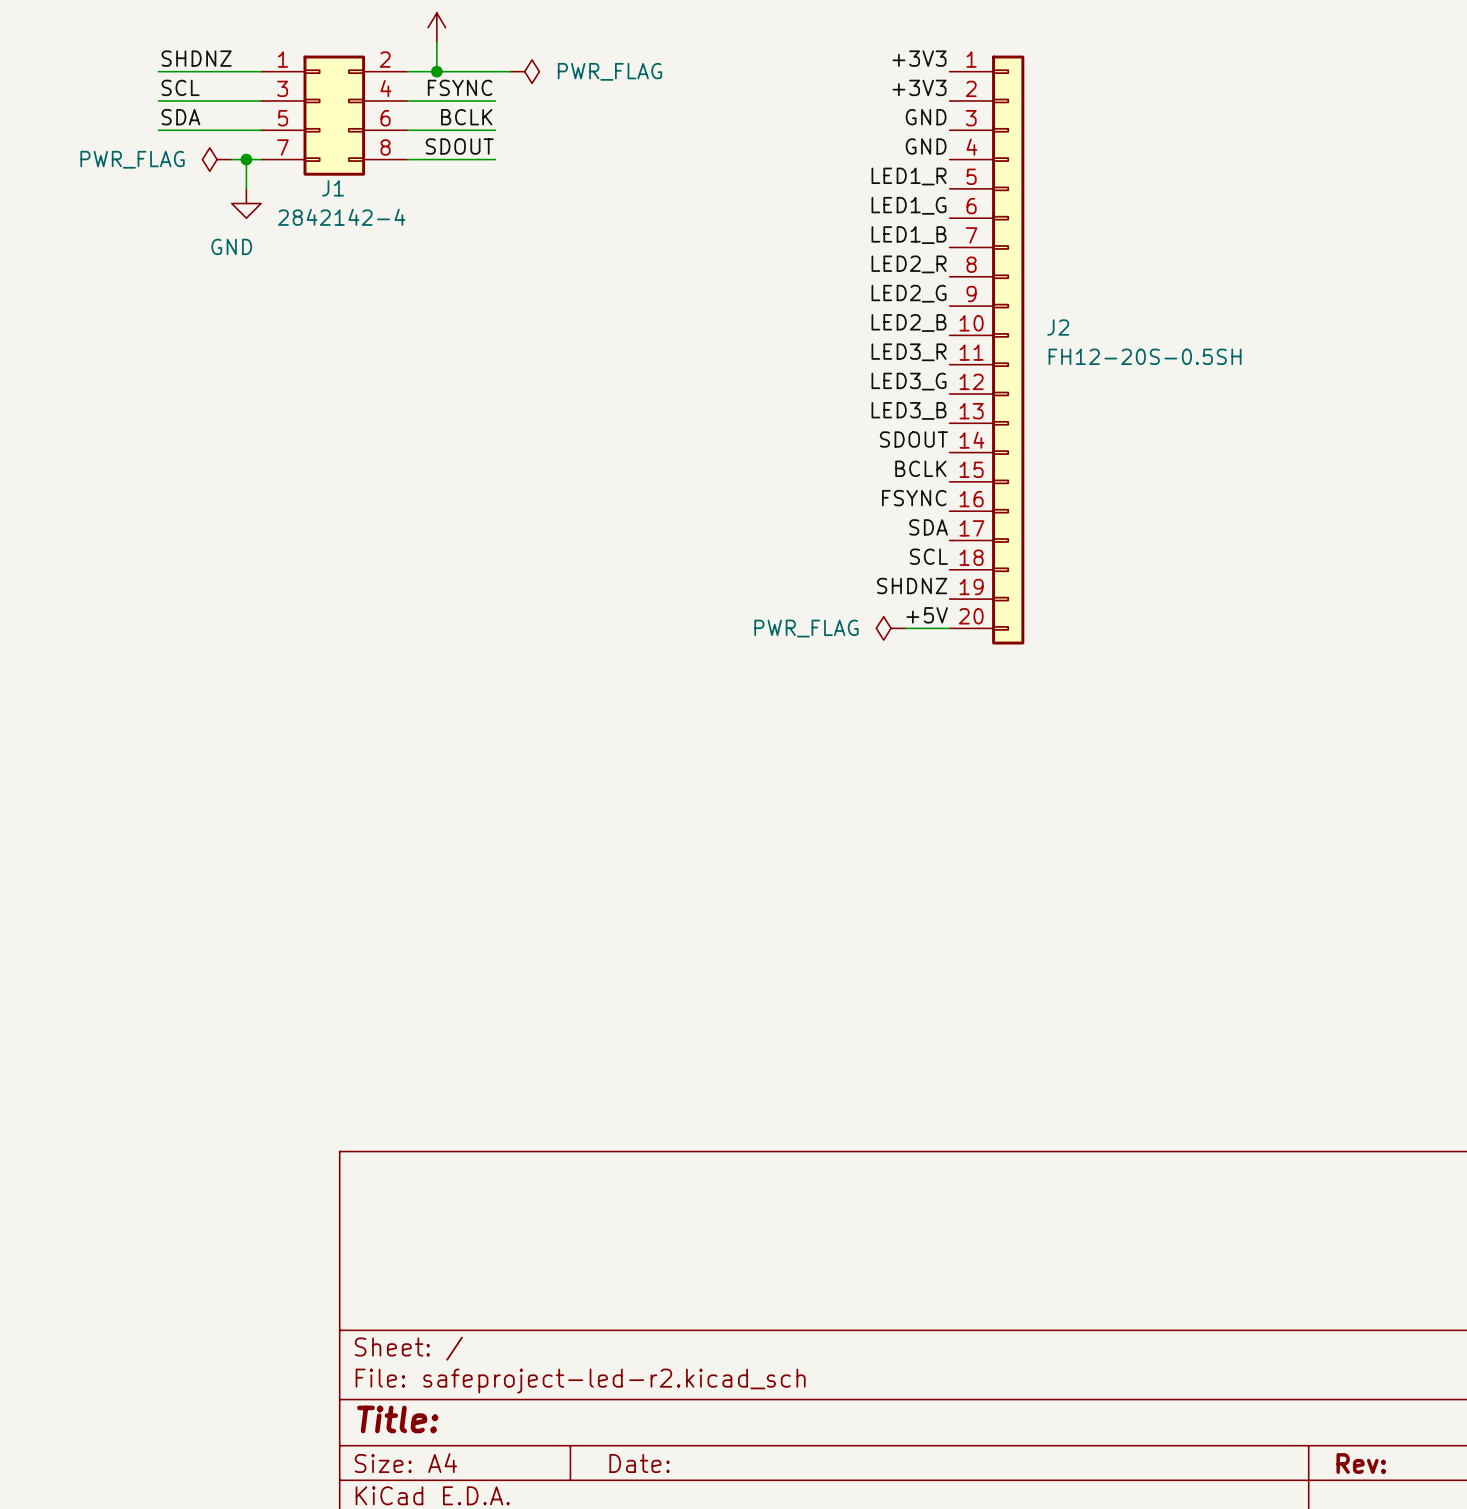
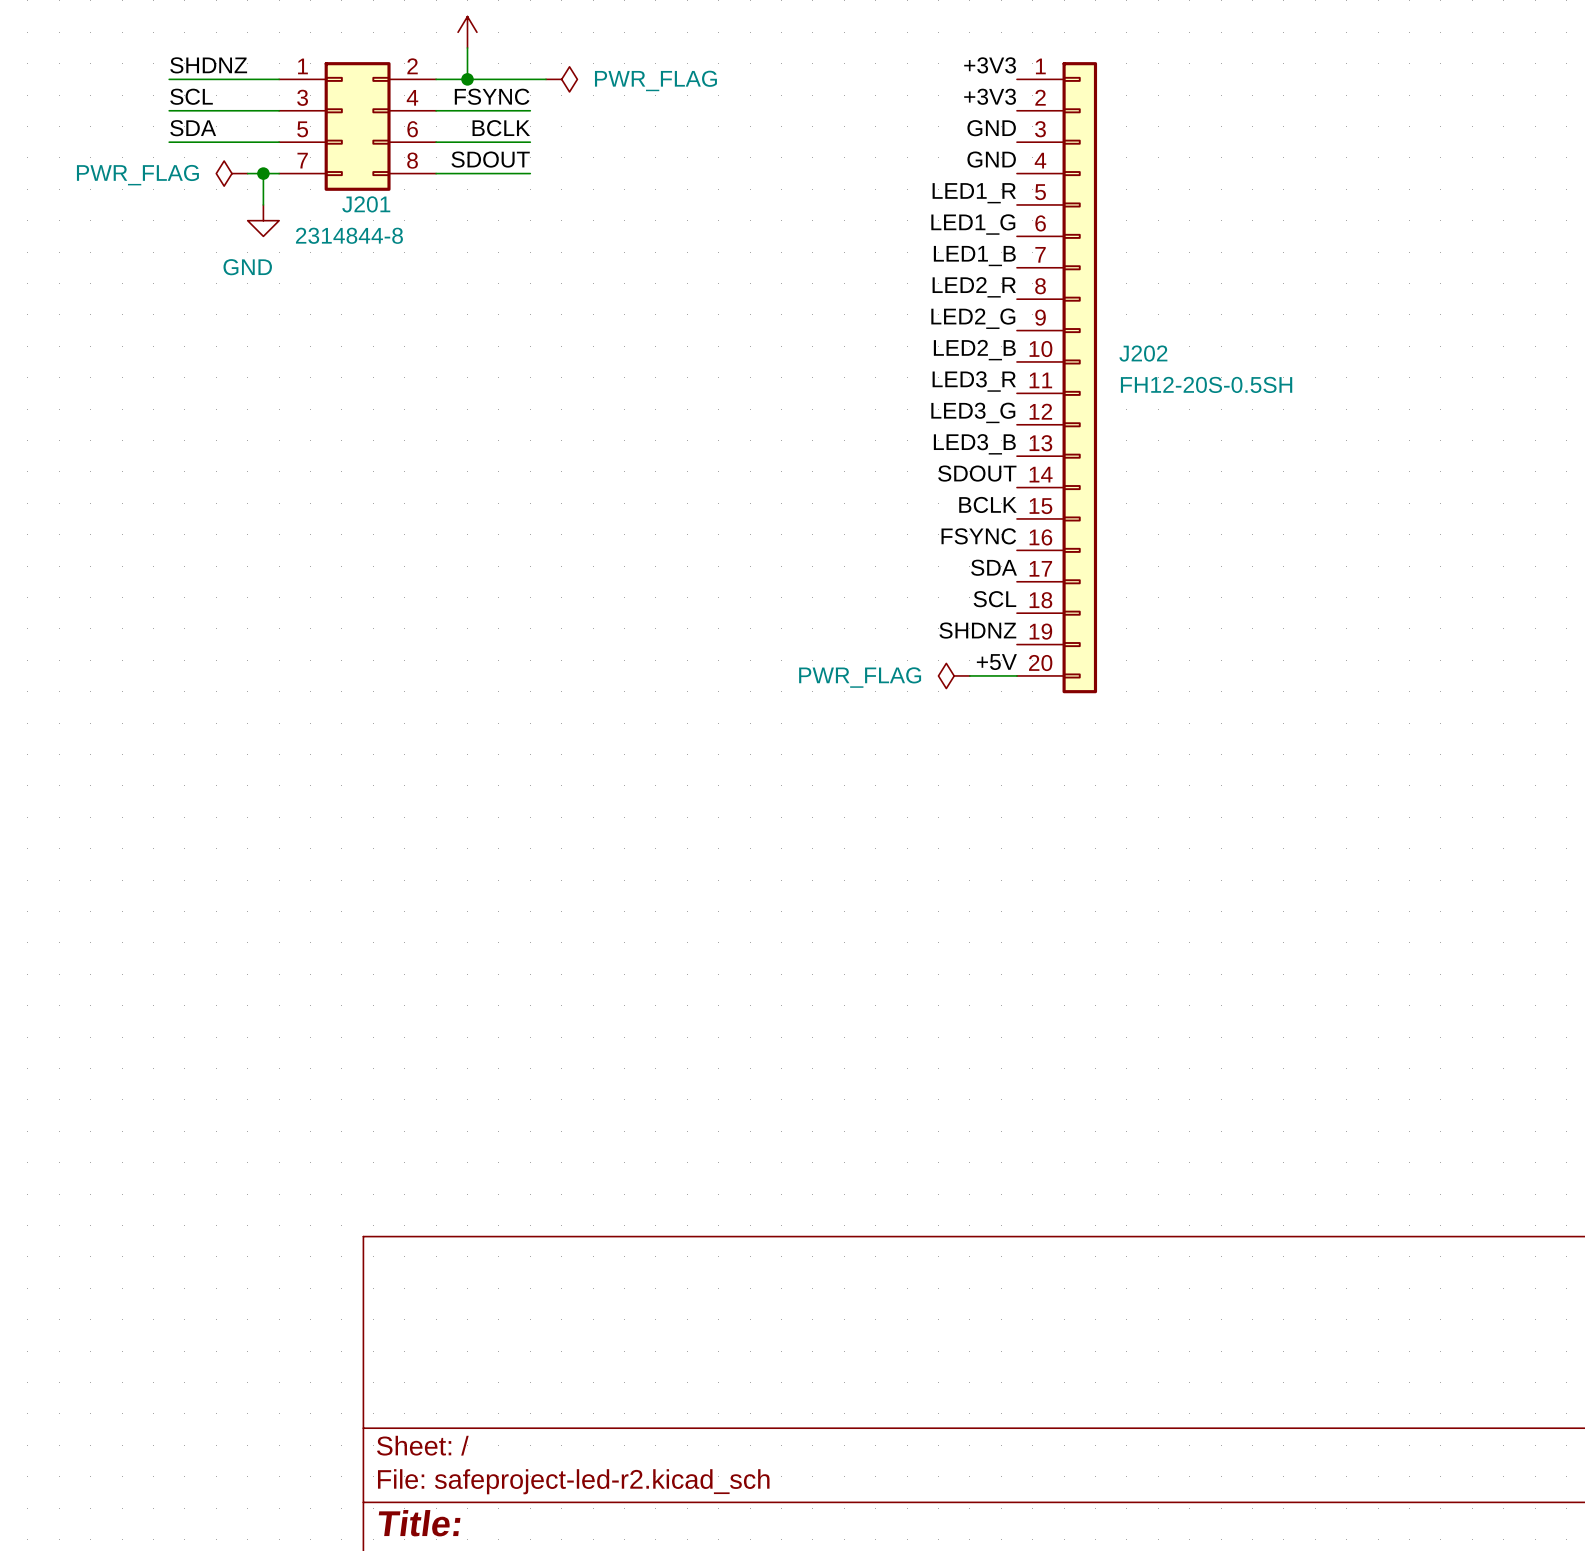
J1 name: J1 (333, 188) -> J201 (366, 204)
J1 value: 2842142-4 (341, 217) -> 2314844-8 (349, 235)
J2 name: J2 (1058, 327) -> J202 (1143, 353)

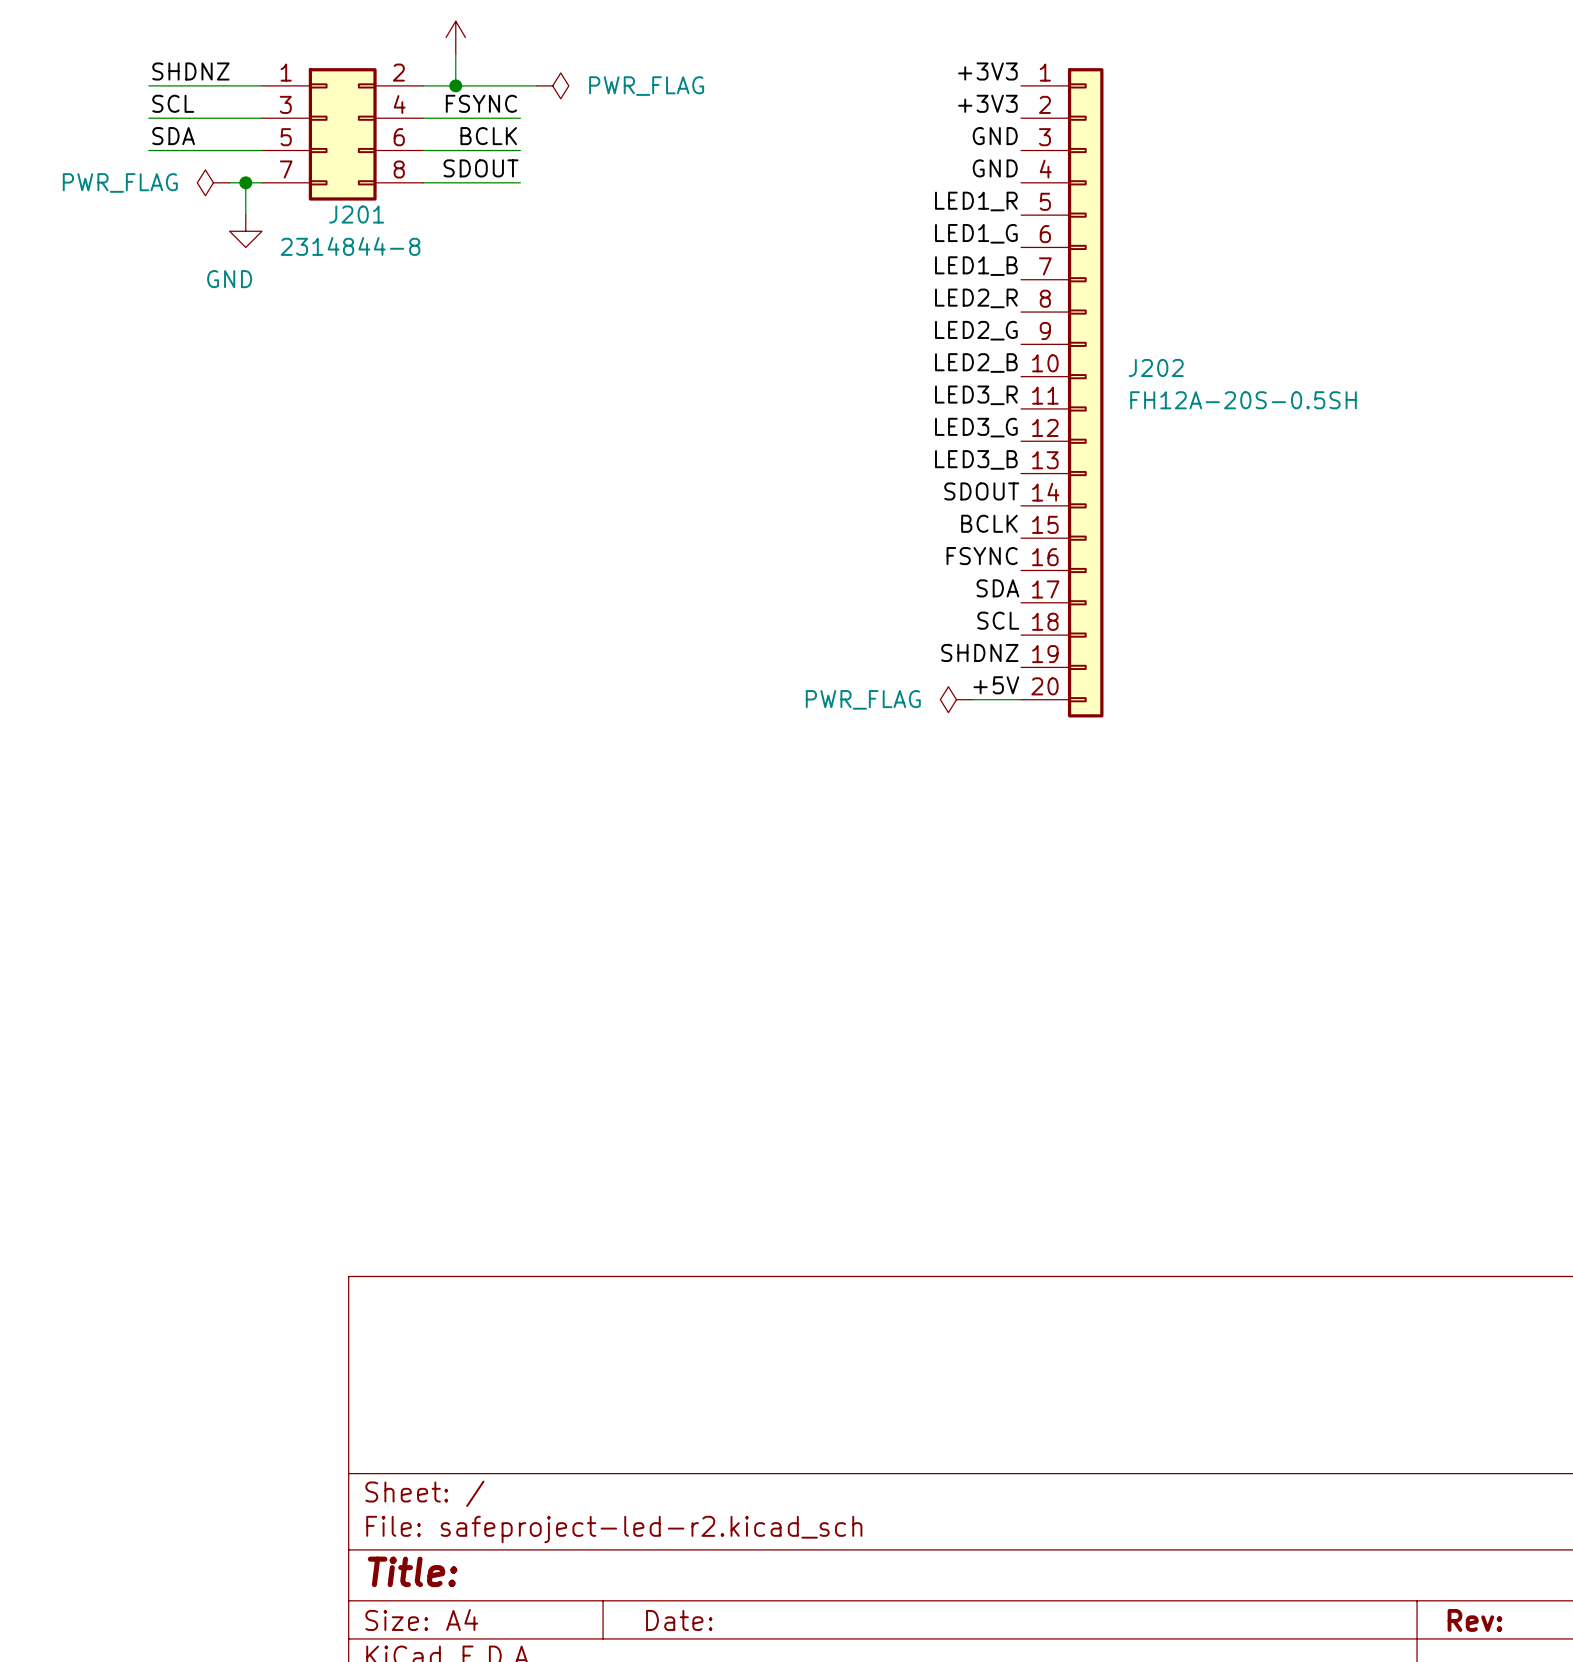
J202 value: FH12-20S-0.5SH (1206, 384) -> FH12A-20S-0.5SH (1243, 400)

